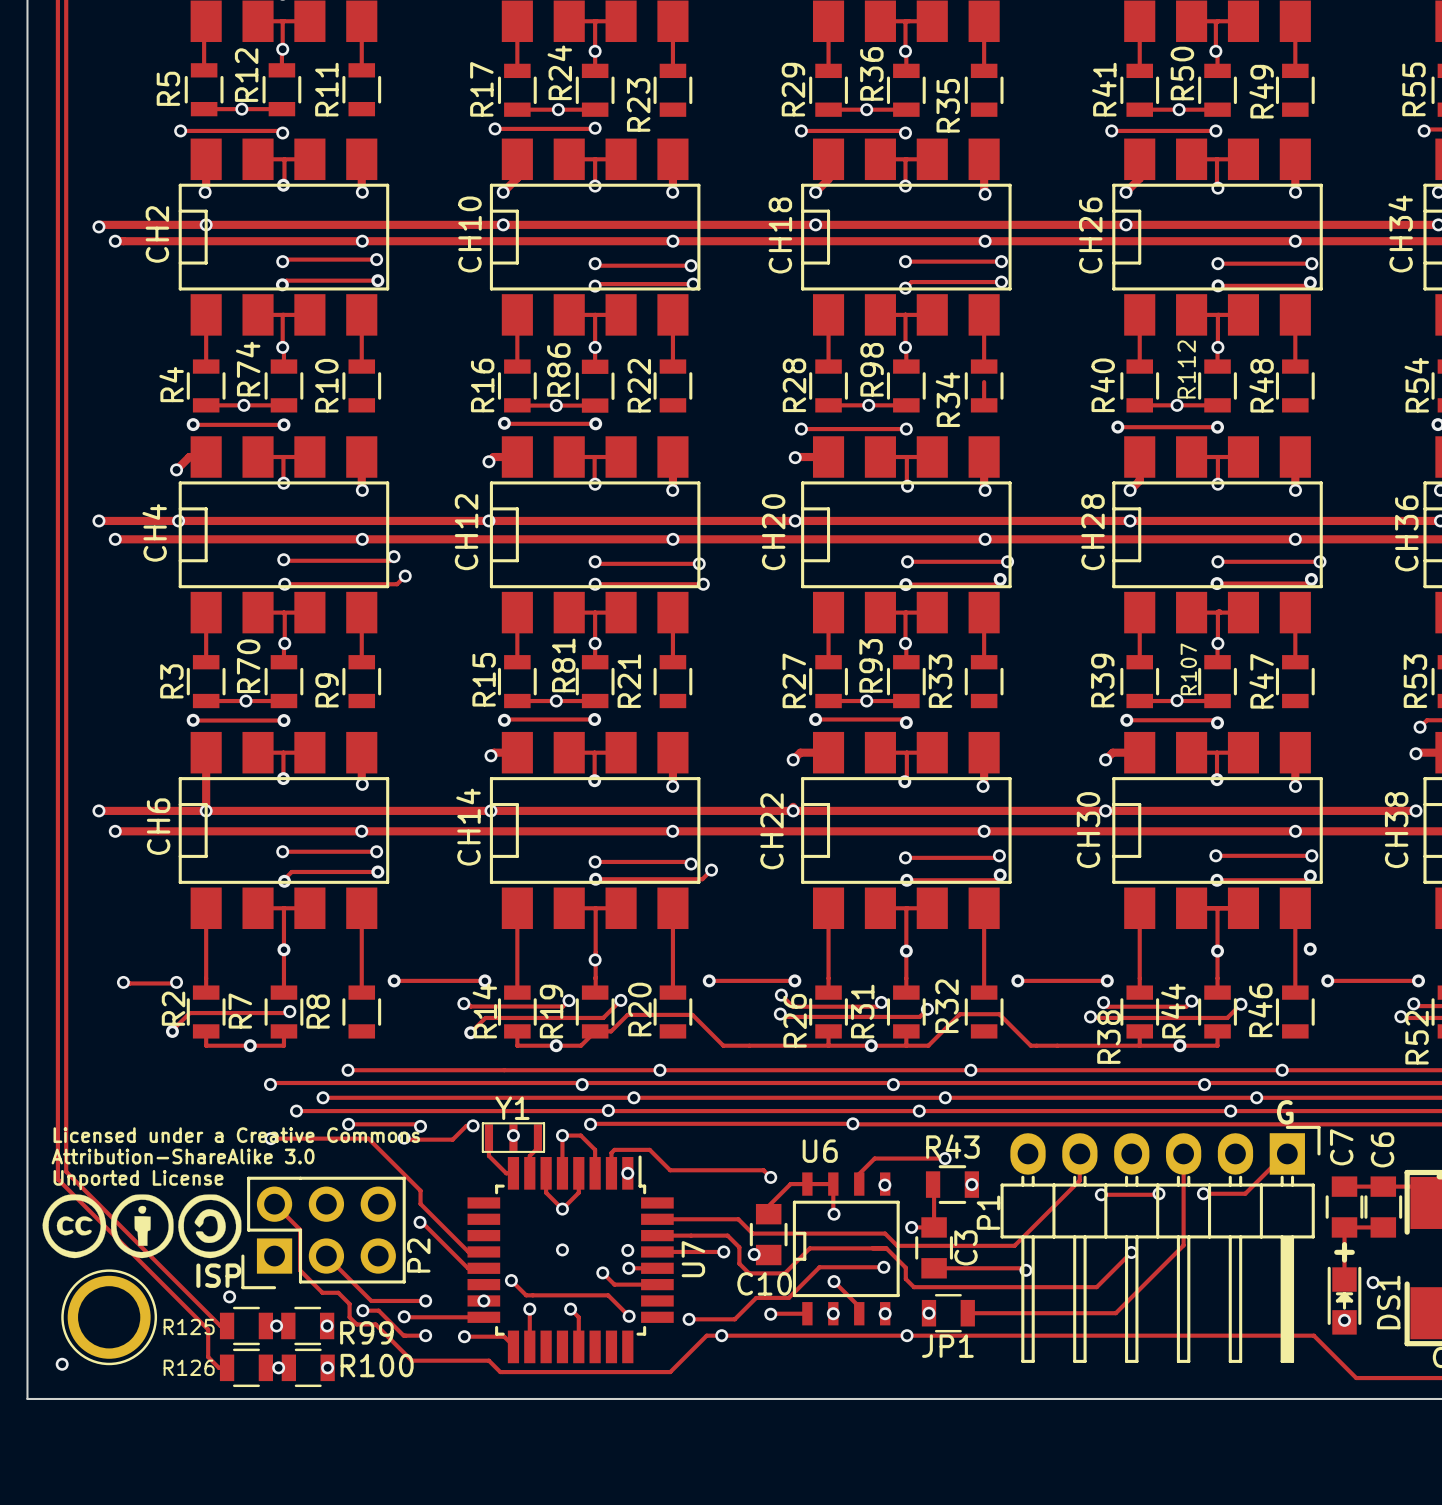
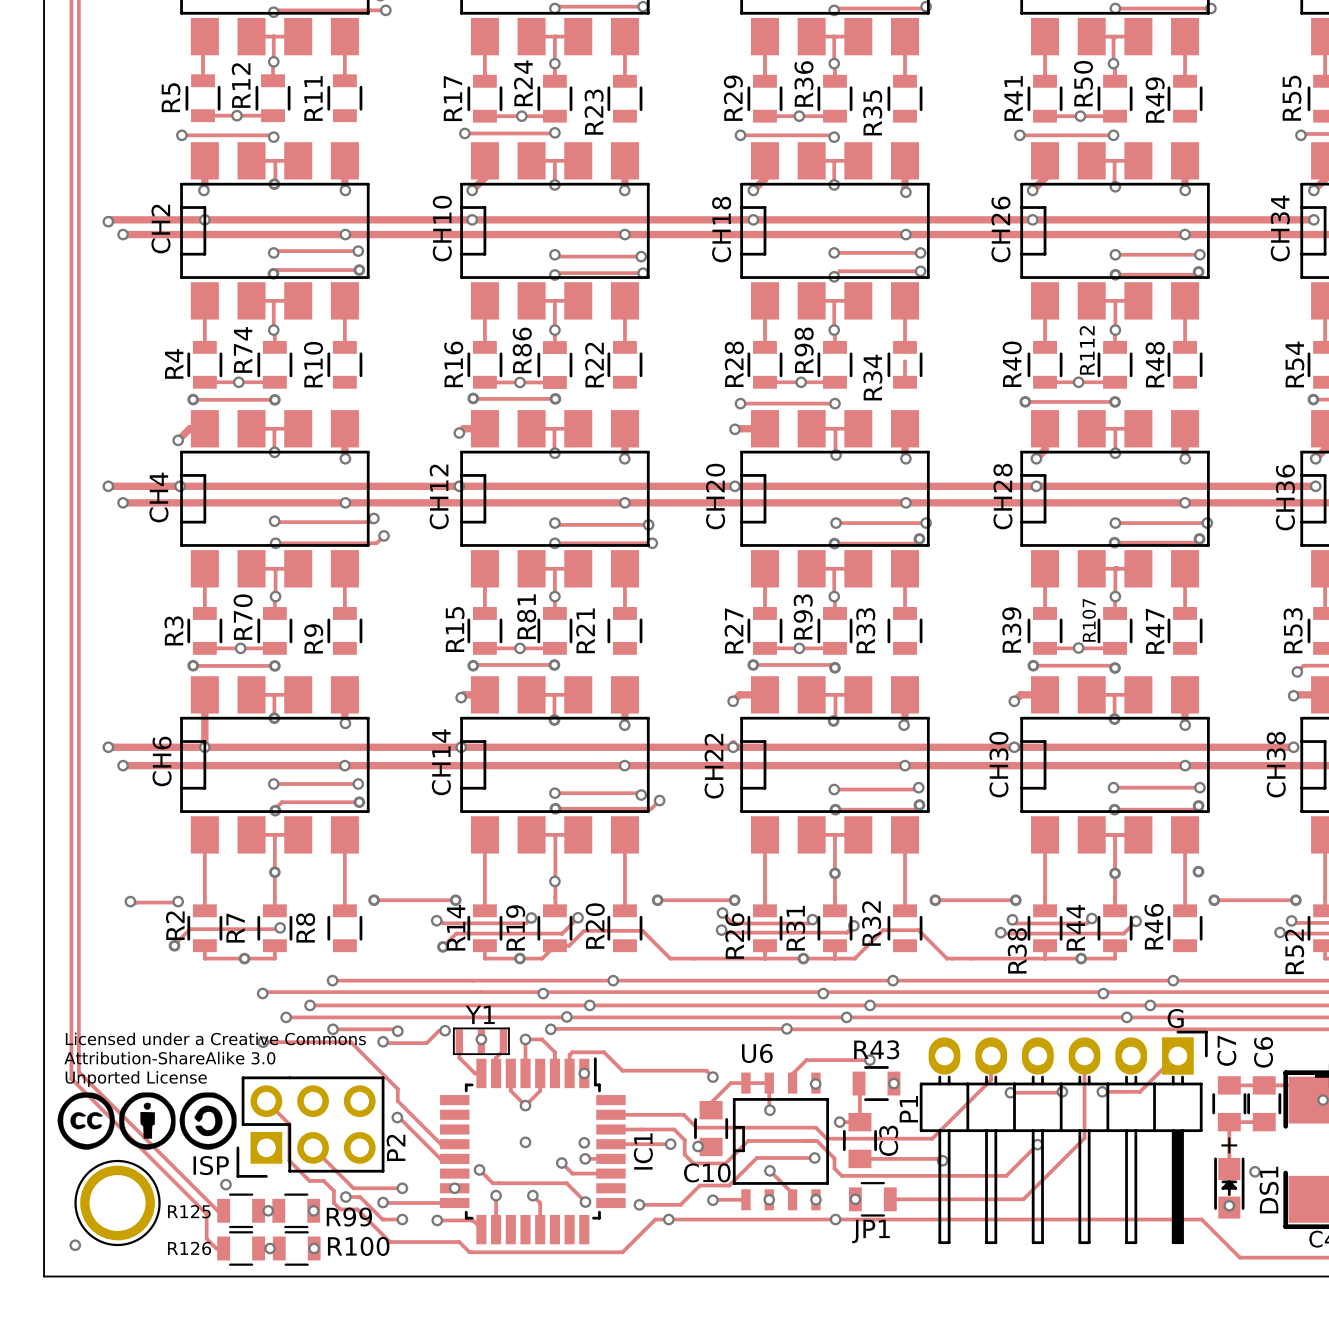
U7 name: U7 (693, 1259) -> IC1 (643, 1151)

